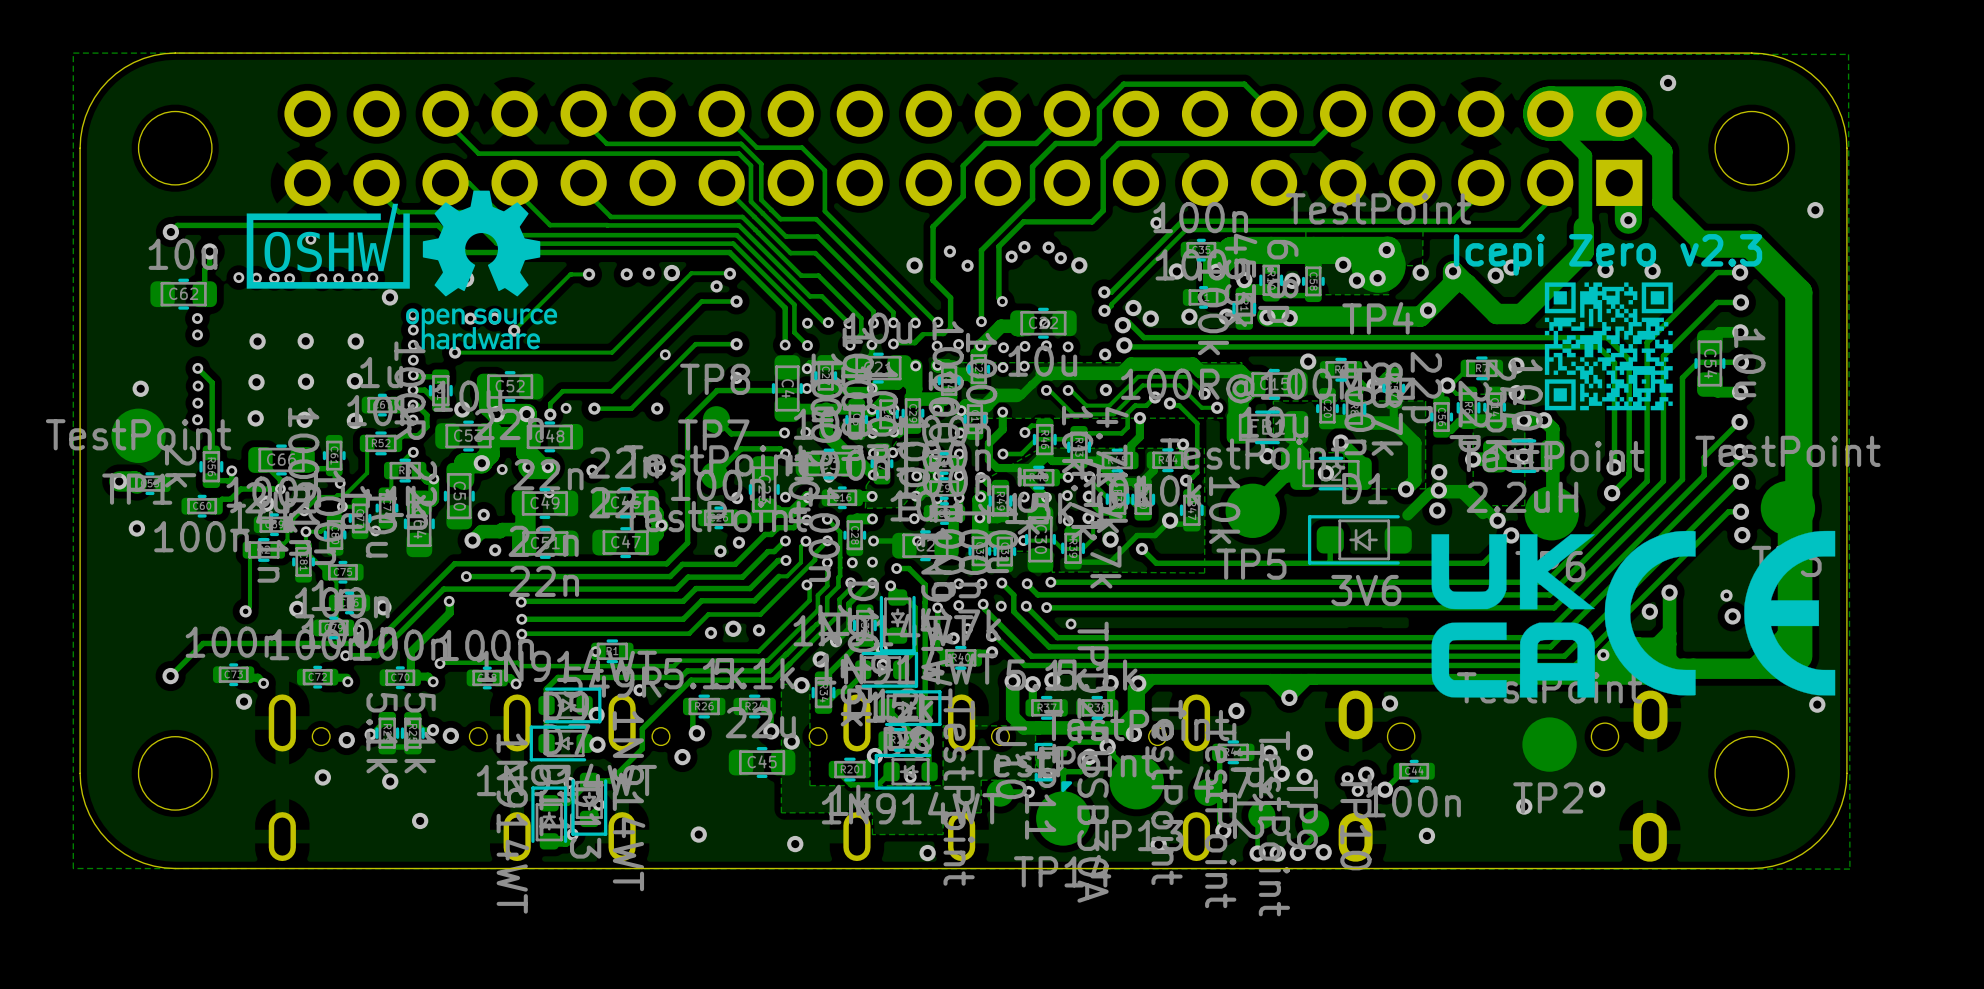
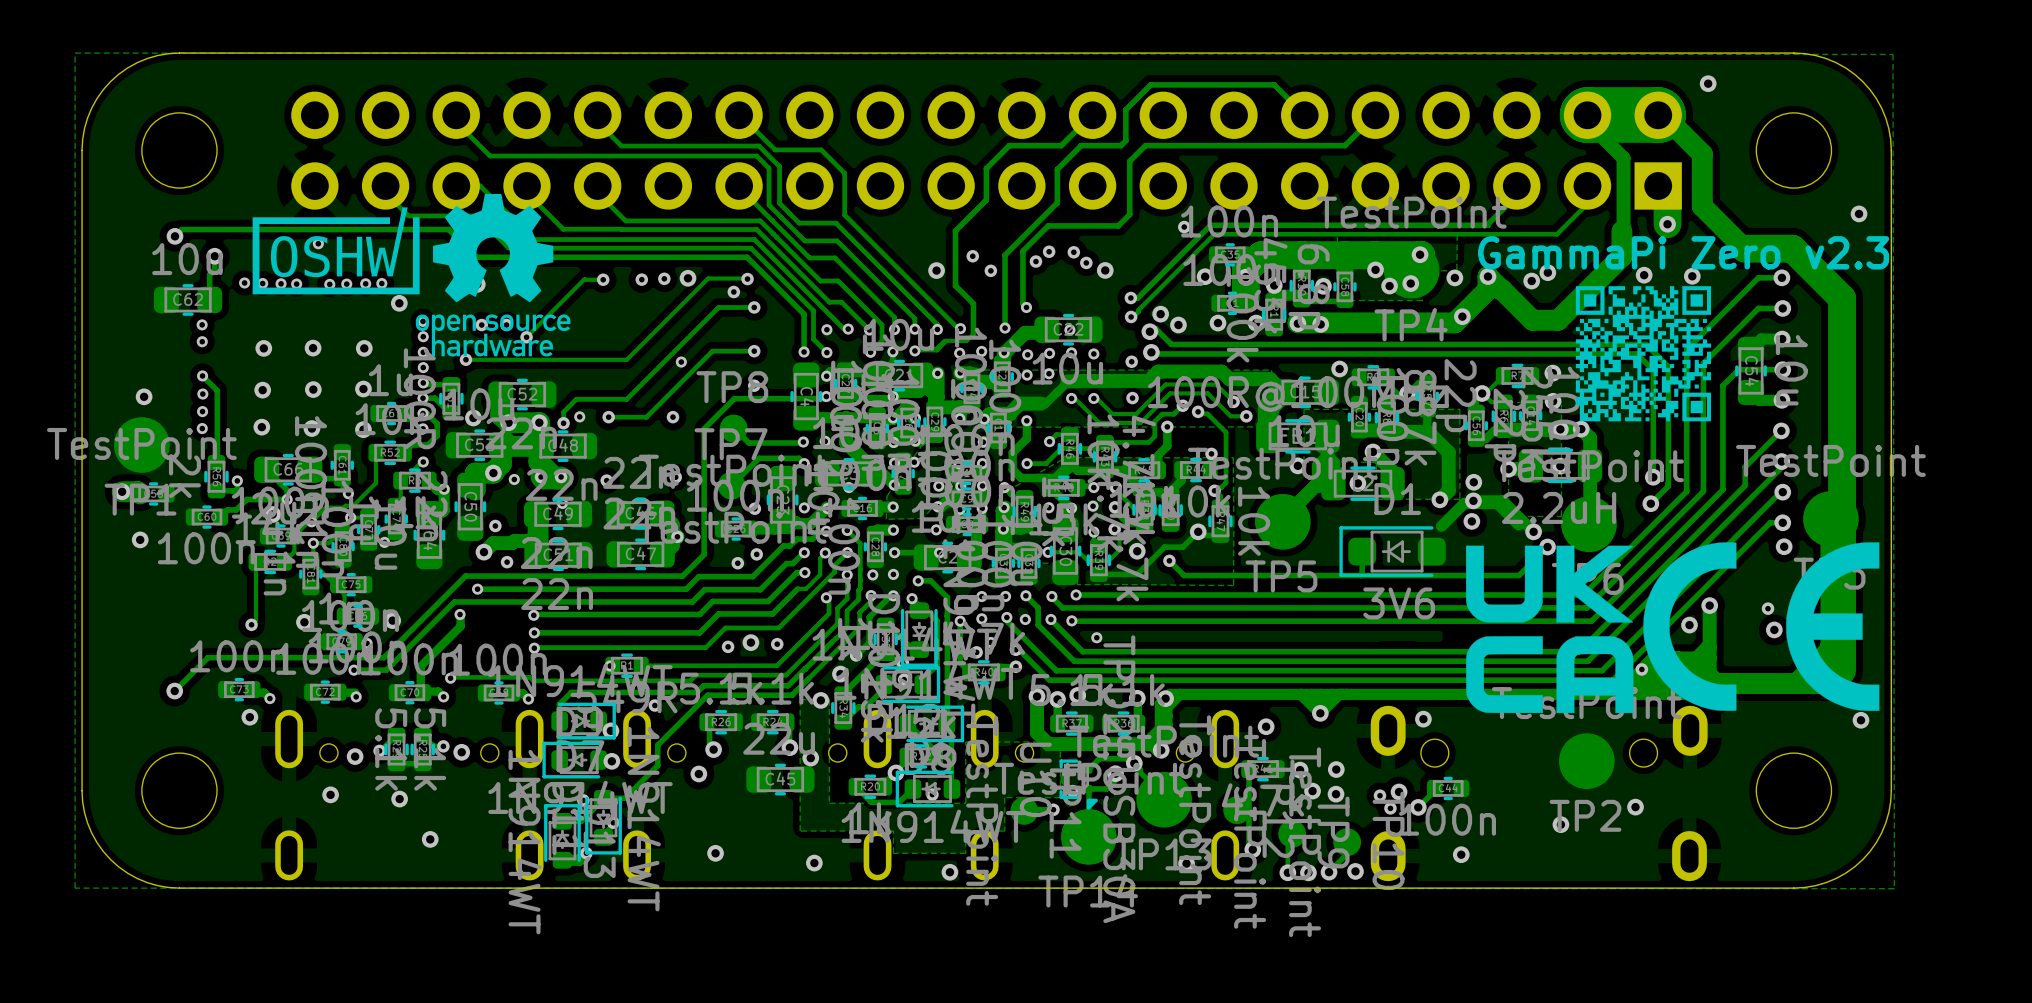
text: Icepi Zero v2.3 (1608, 254) -> GammaPi Zero v2.3 (1683, 252)
drawing shape: [1544, 282, 1673, 411] -> [1575, 286, 1712, 422]

